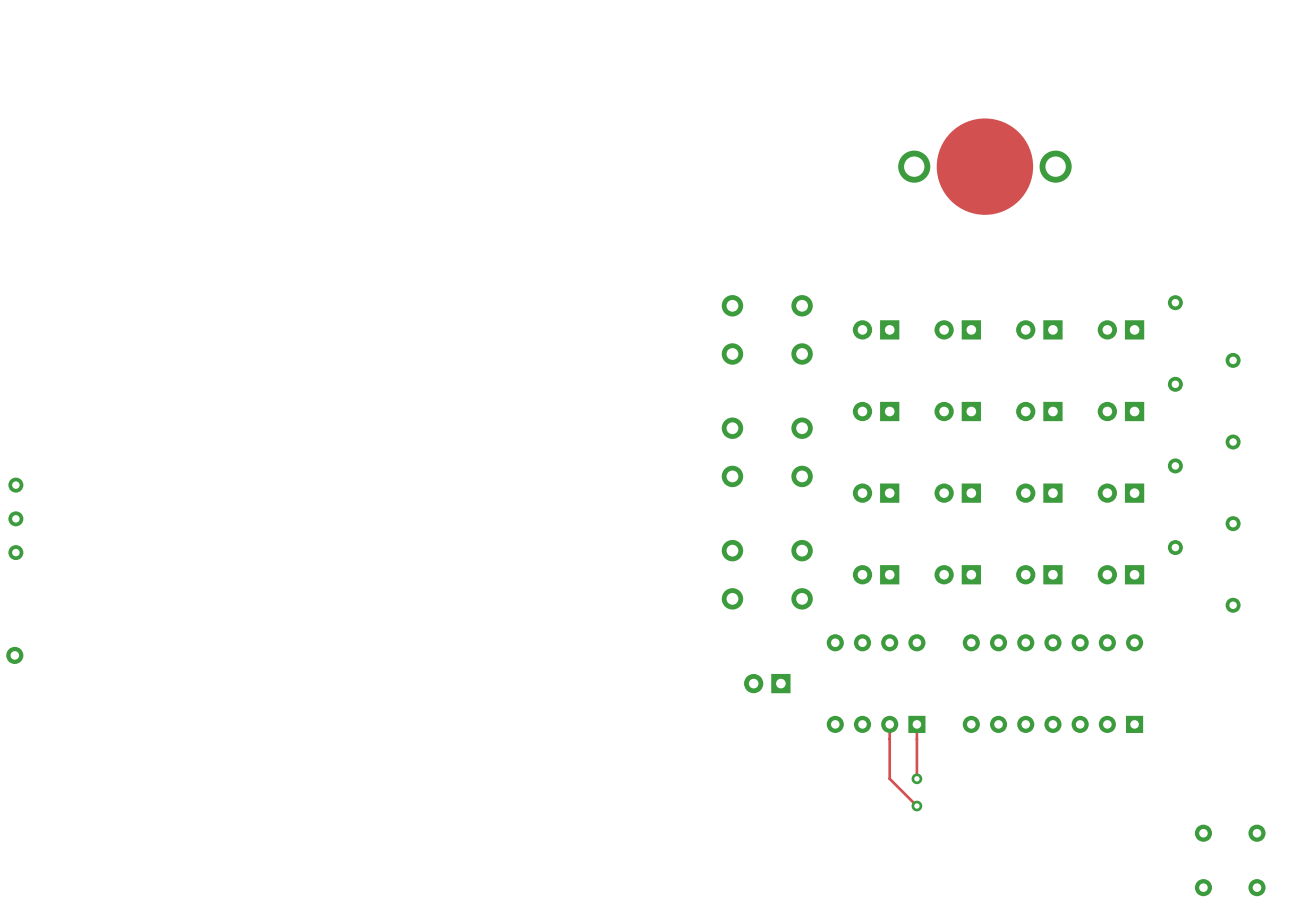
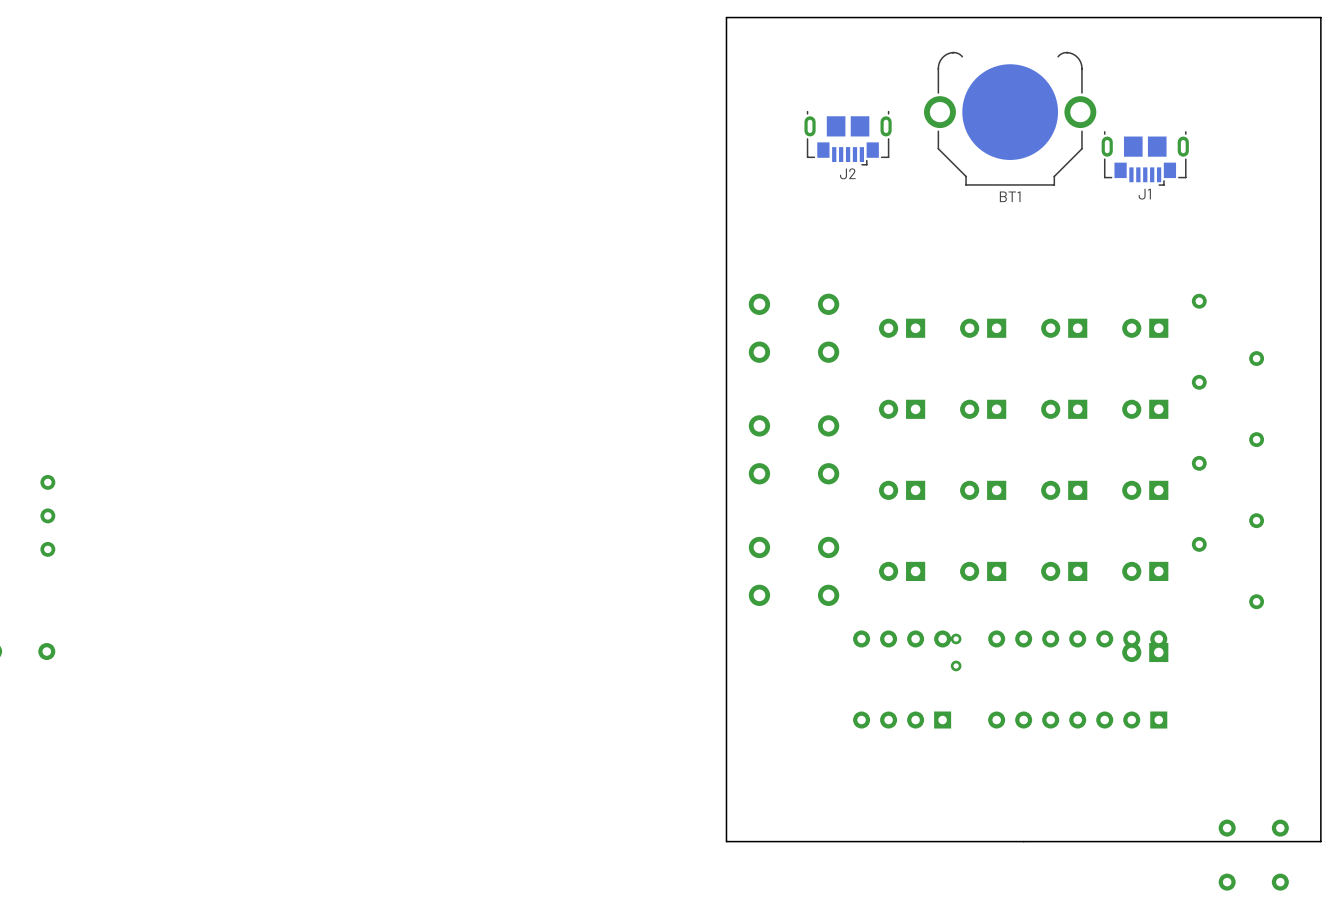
board edge: none -> (1320, 17) (726, 17) (726, 841) (1320, 841) (1320, 17)
J2: none -> (848, 138)
J1: none -> (1145, 158)
BT1 side: top (984, 166) -> bottom (1010, 118)
part: none -> (1145, 652)
part: (767, 683) -> none
top track: (889, 724) (889, 778) (916, 806) -> none
top track: (916, 724) (916, 778) -> none
part position: (916, 792) -> (956, 652)

